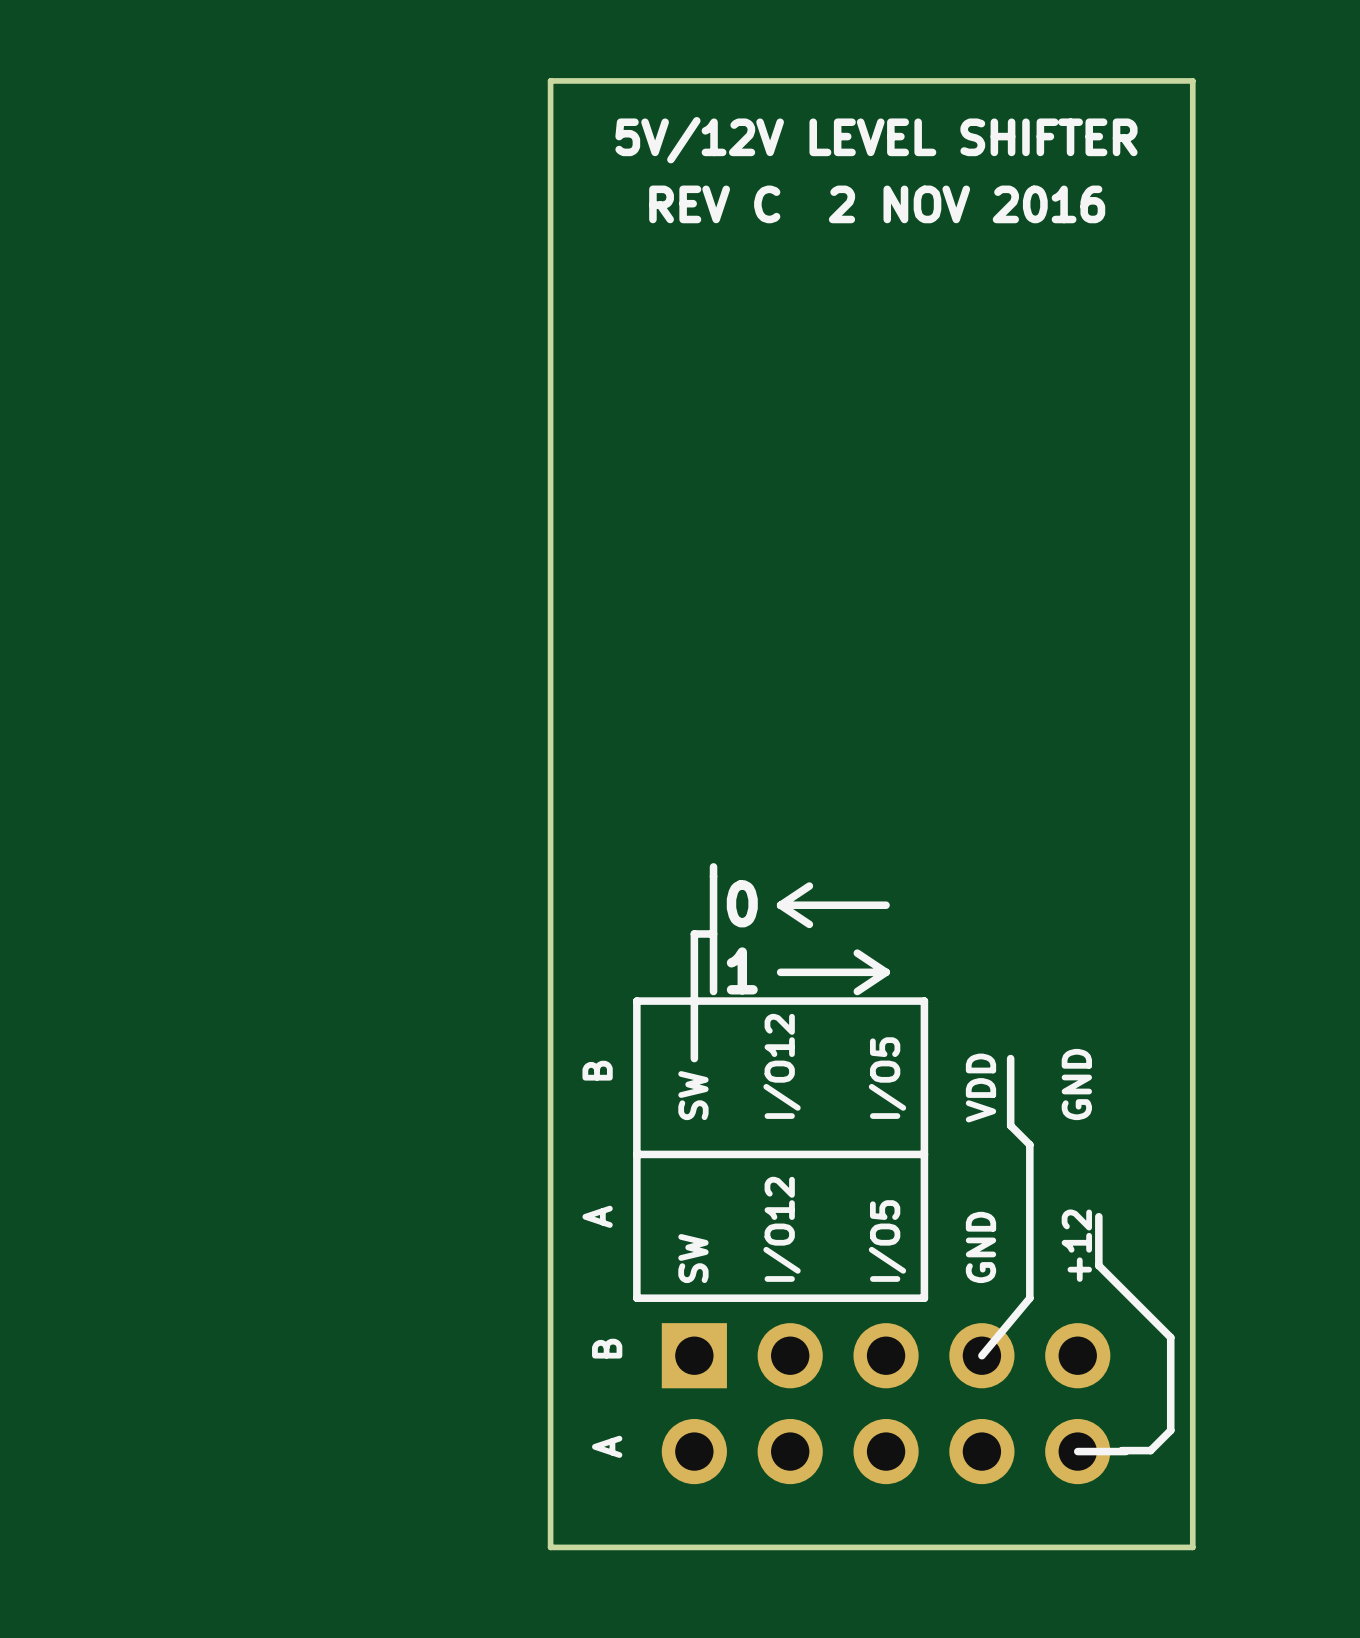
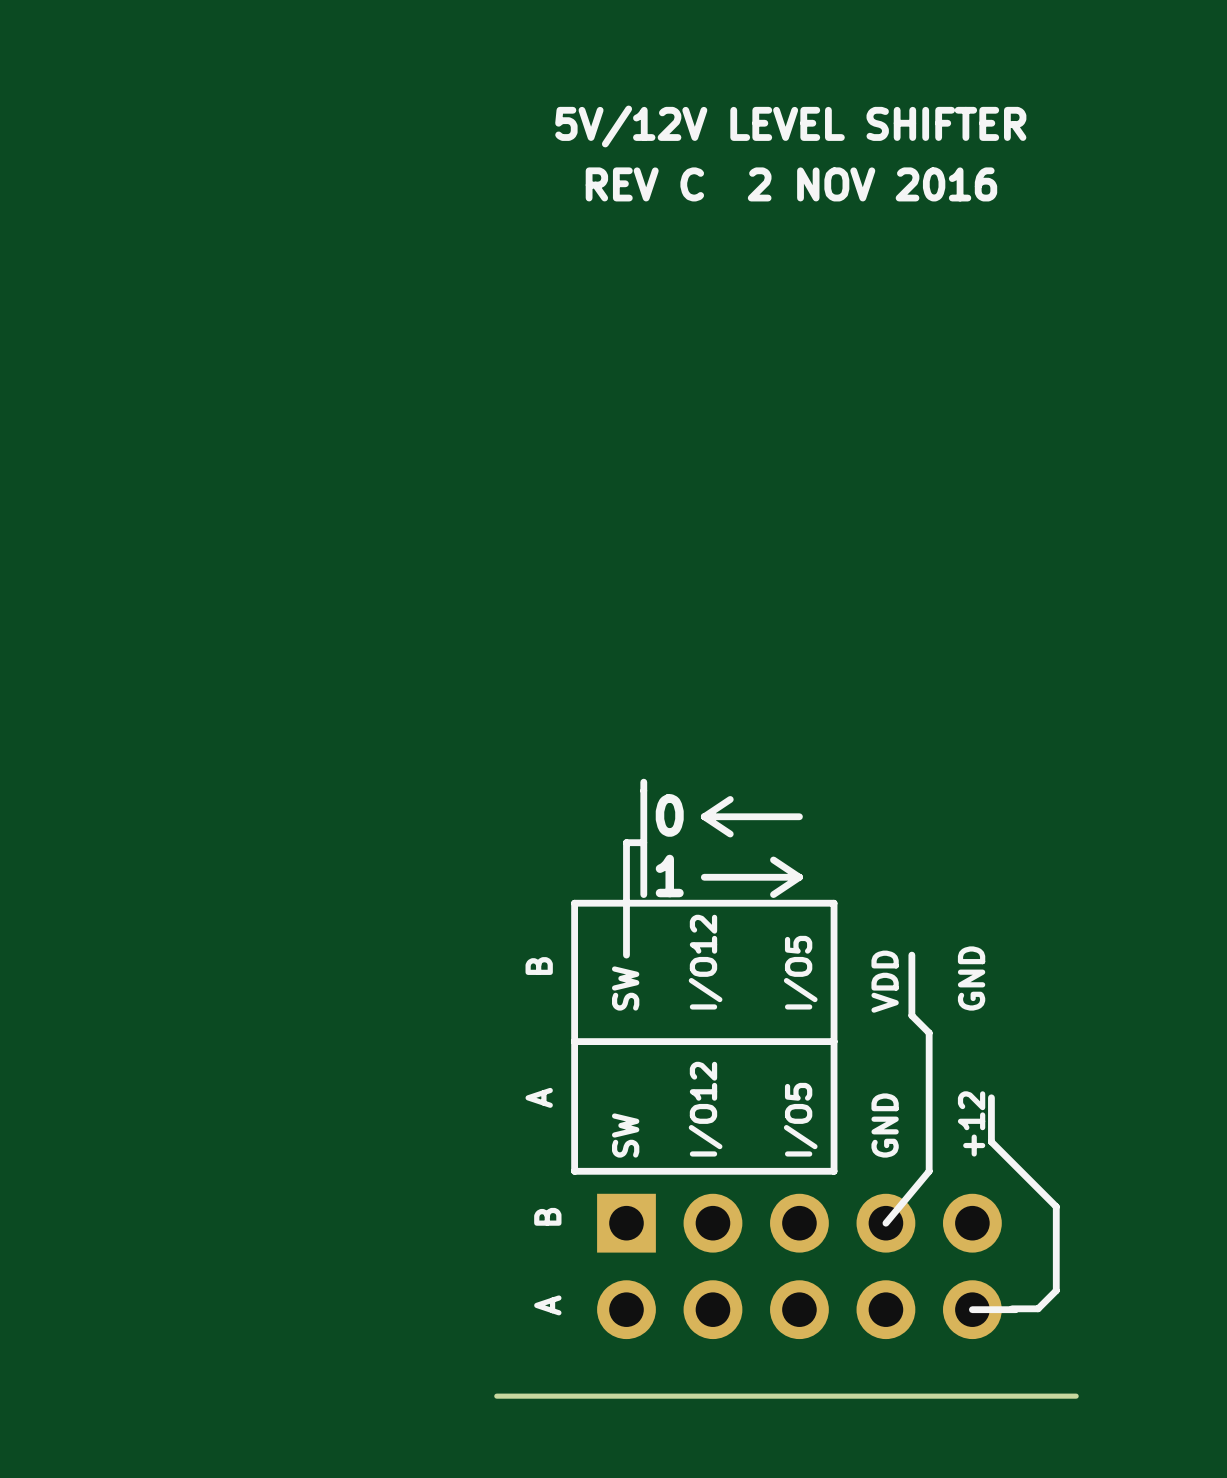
board edge: (1192, 1547) (1192, 80) (550, 80) (550, 1547) -> none

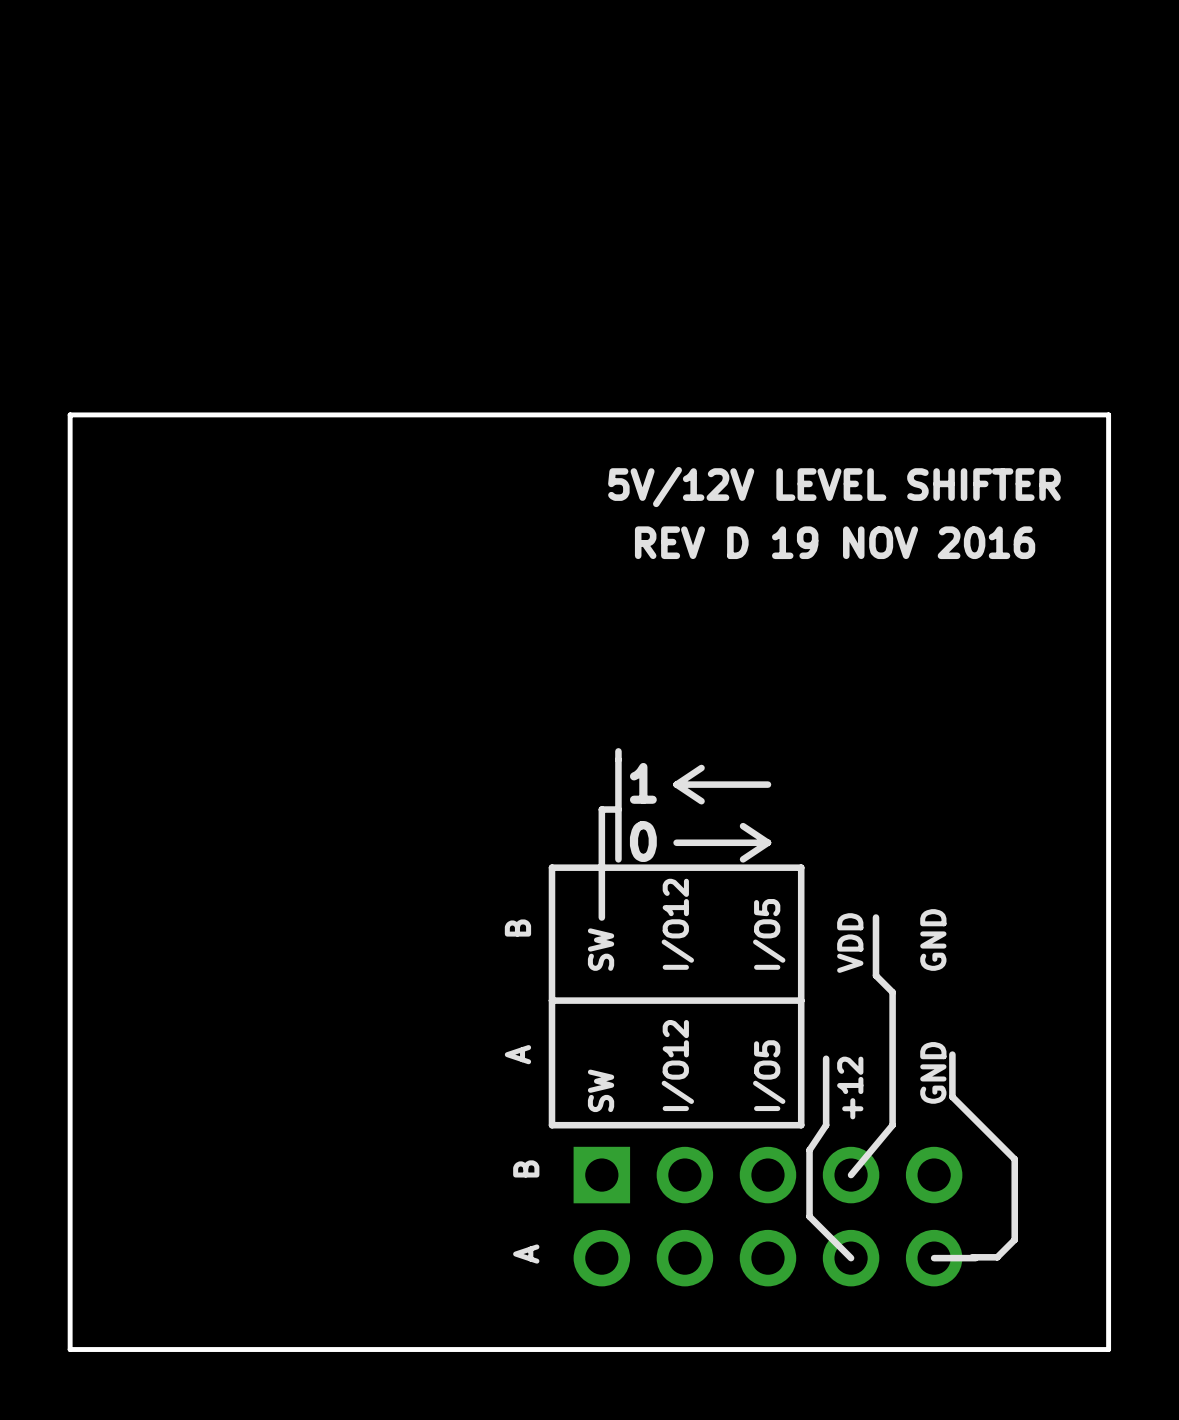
text position: 5V/12V LEVEL SHIFTER (790, 126) -> 5V/12V LEVEL SHIFTER (834, 487)
text: REV C 2 NOV 2016 (791, 184) -> none
board edge: none -> (1108, 414) (1108, 1349) (70, 1349) (70, 414) (1108, 414)
text: none -> REV D 19 NOV 2016 (835, 542)
text: 0 (669, 815) -> 1 (643, 783)
text: 1 (669, 876) -> 0 (643, 841)
line: none -> (826, 1058) (826, 1125) (809, 1150) (809, 1216) (851, 1258)
text position: +12 (971, 1123) -> +12 (850, 1088)
text position: GND (885, 1125) -> GND (933, 1072)
board edge: (1076, 1396) (496, 1396) -> none

